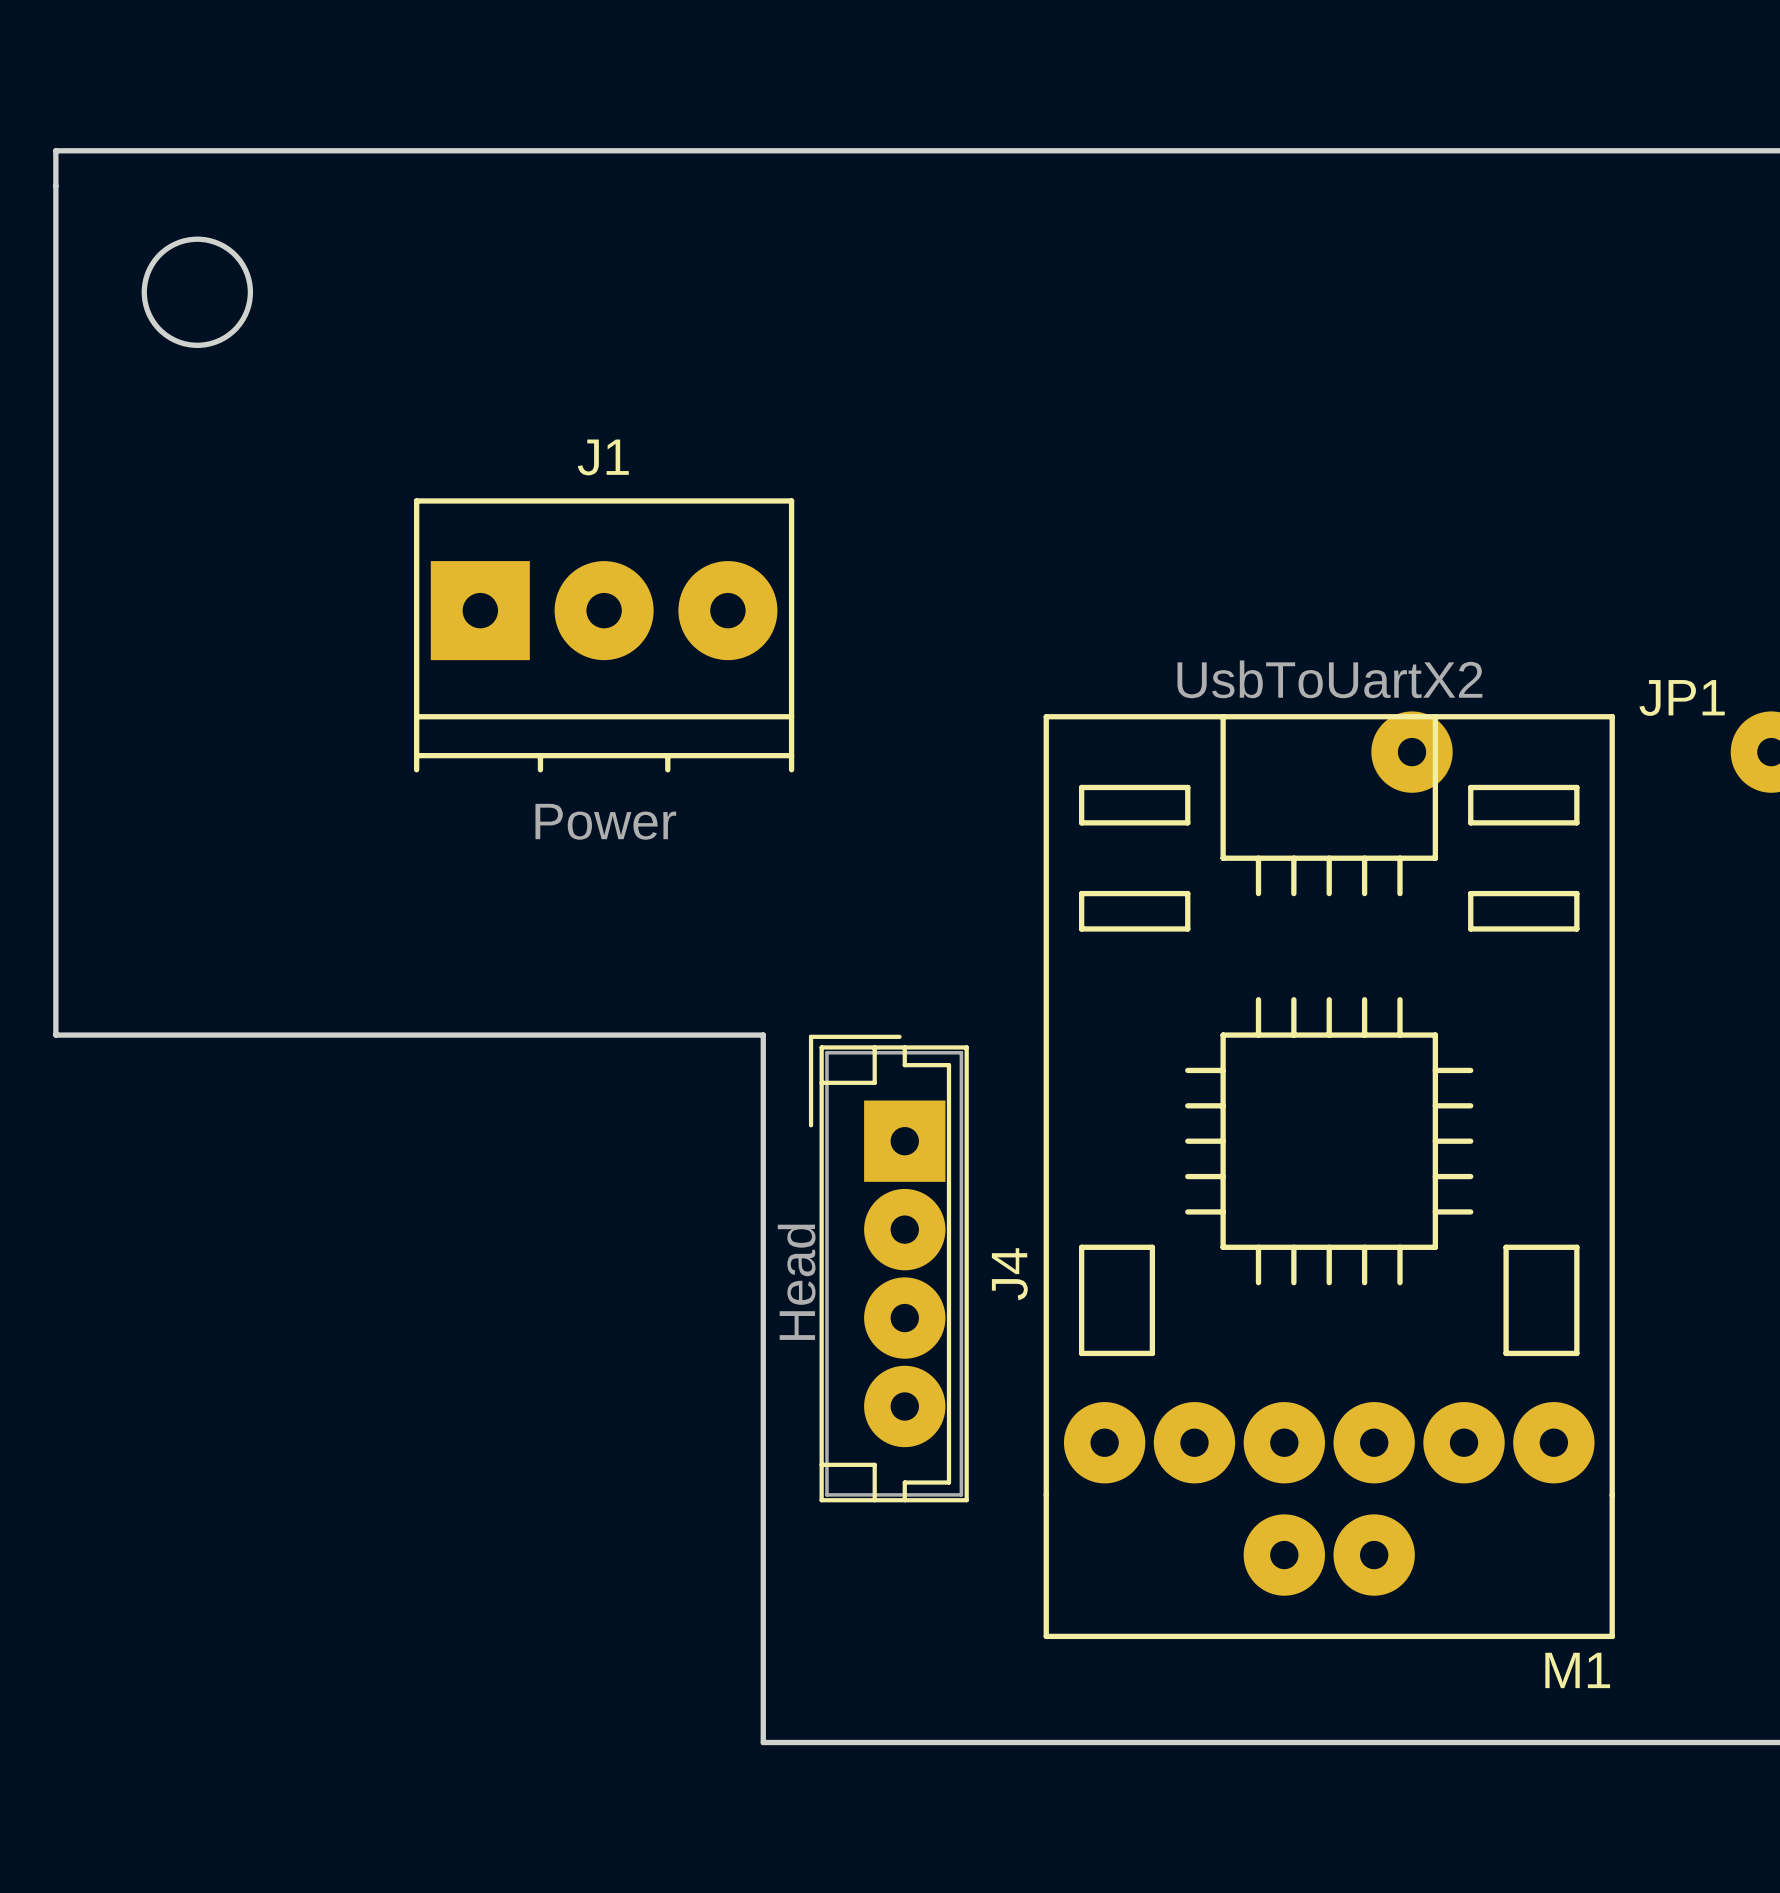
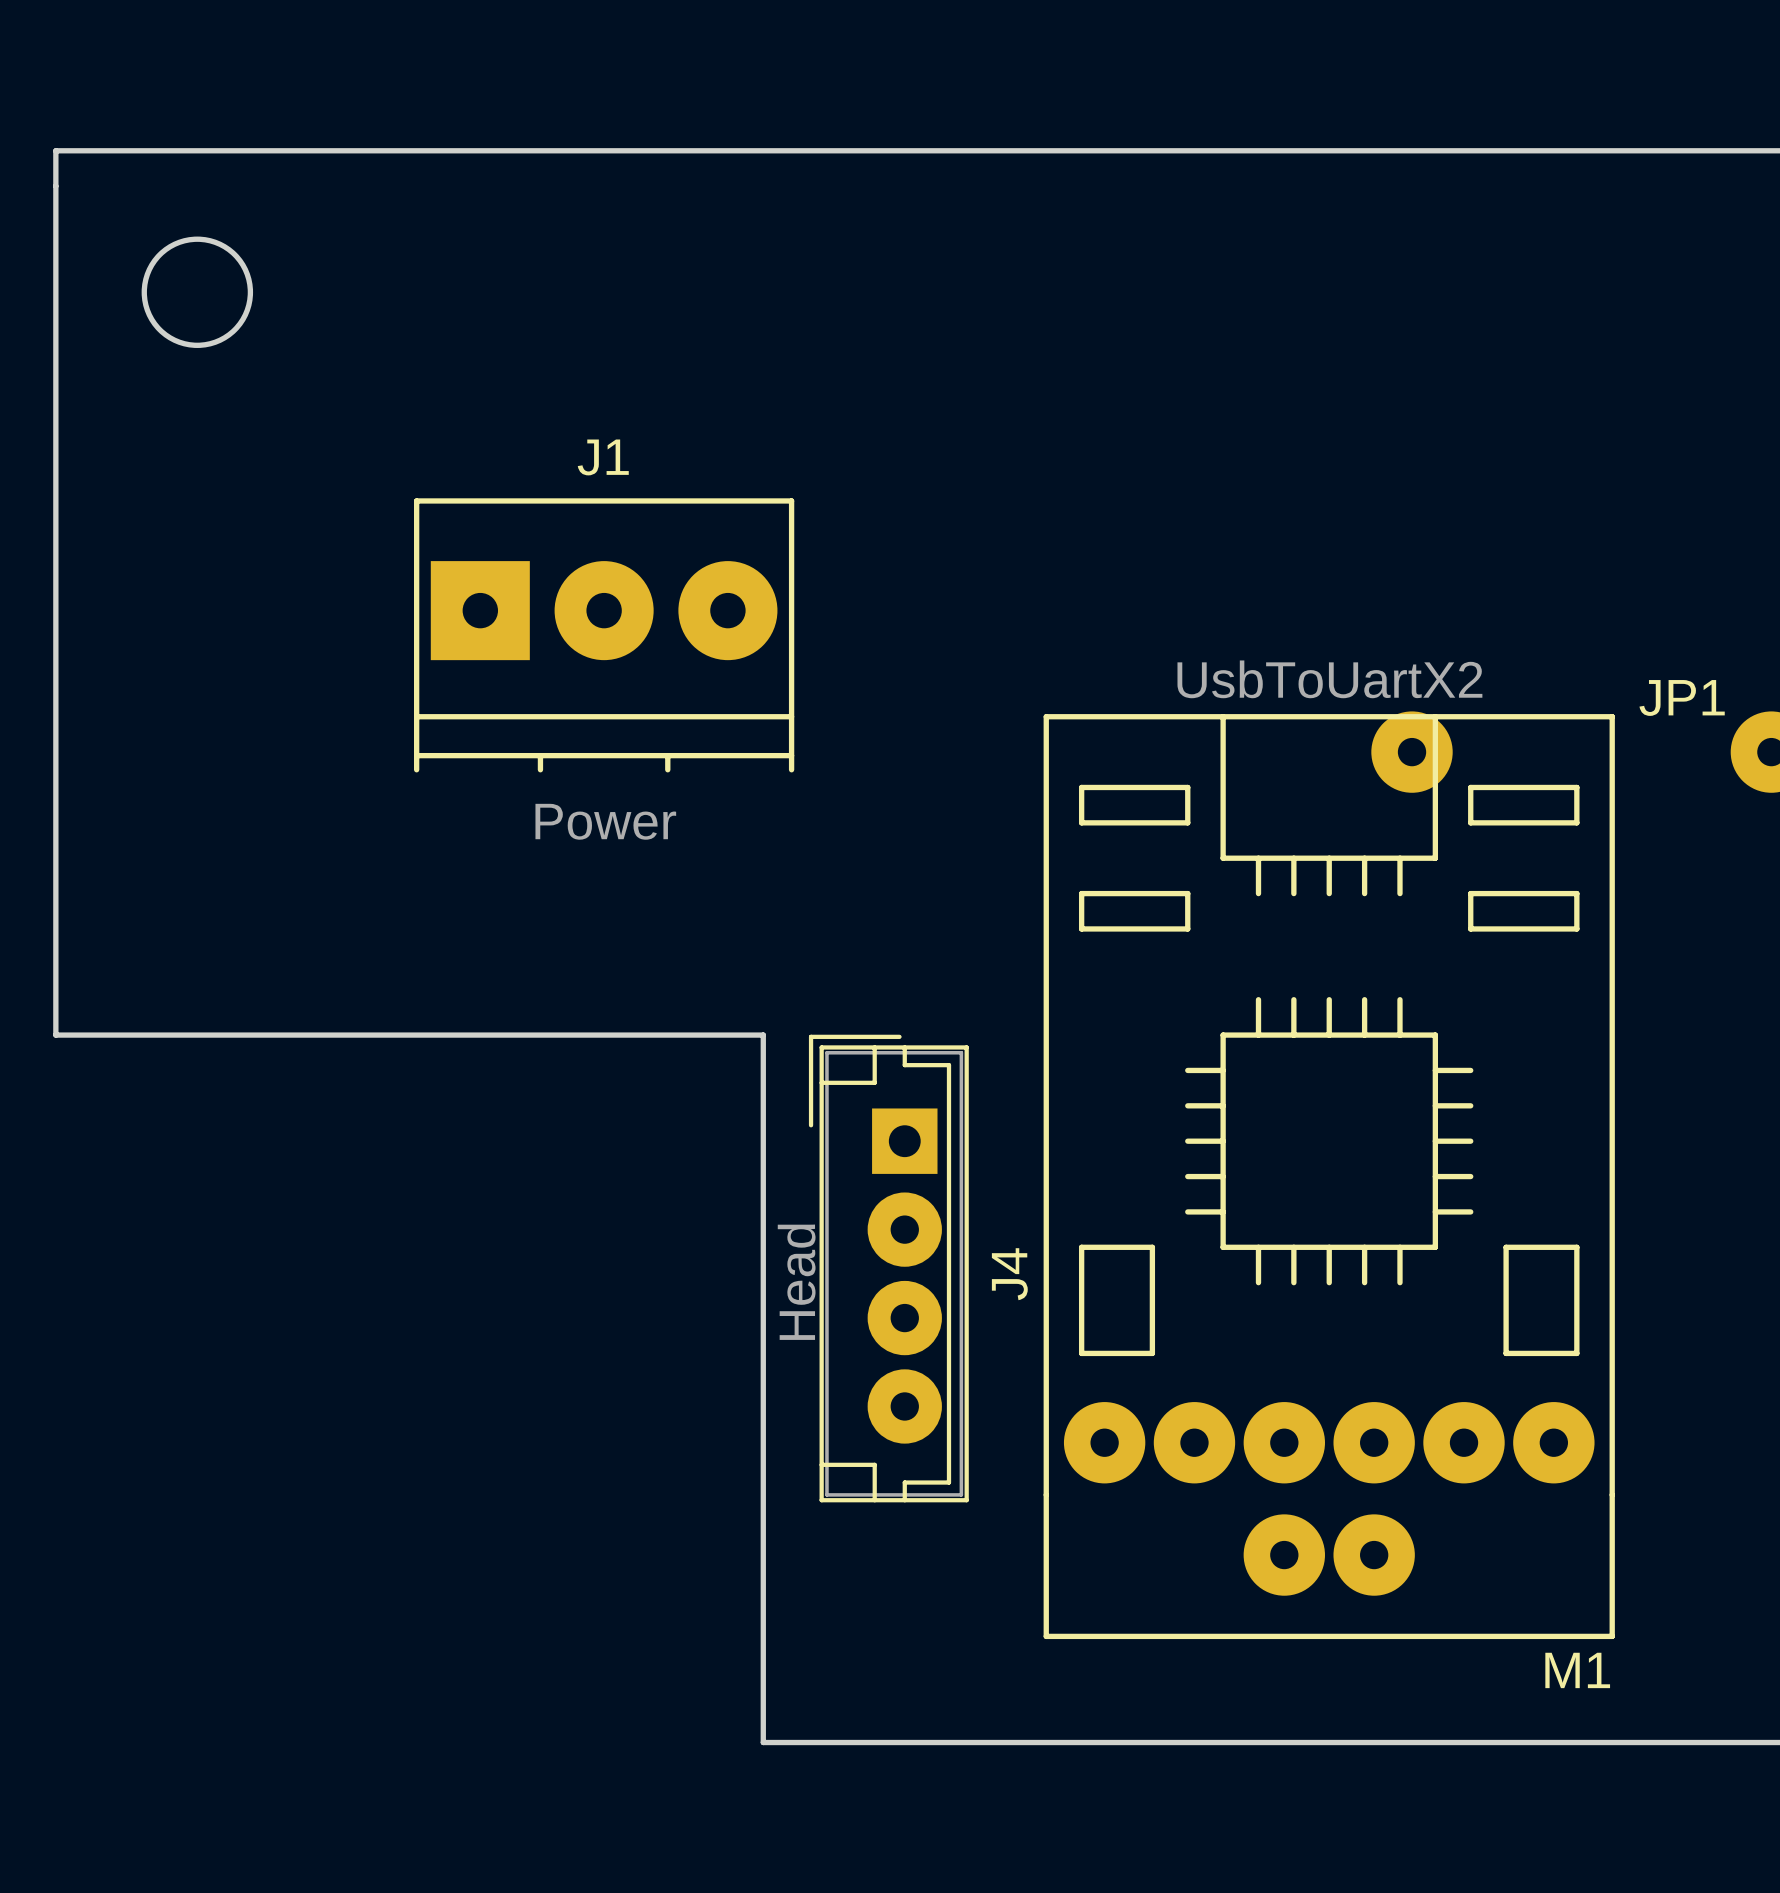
J4 footprint: [808, 1034, 969, 1503] -> [808, 1034, 969, 1503]

